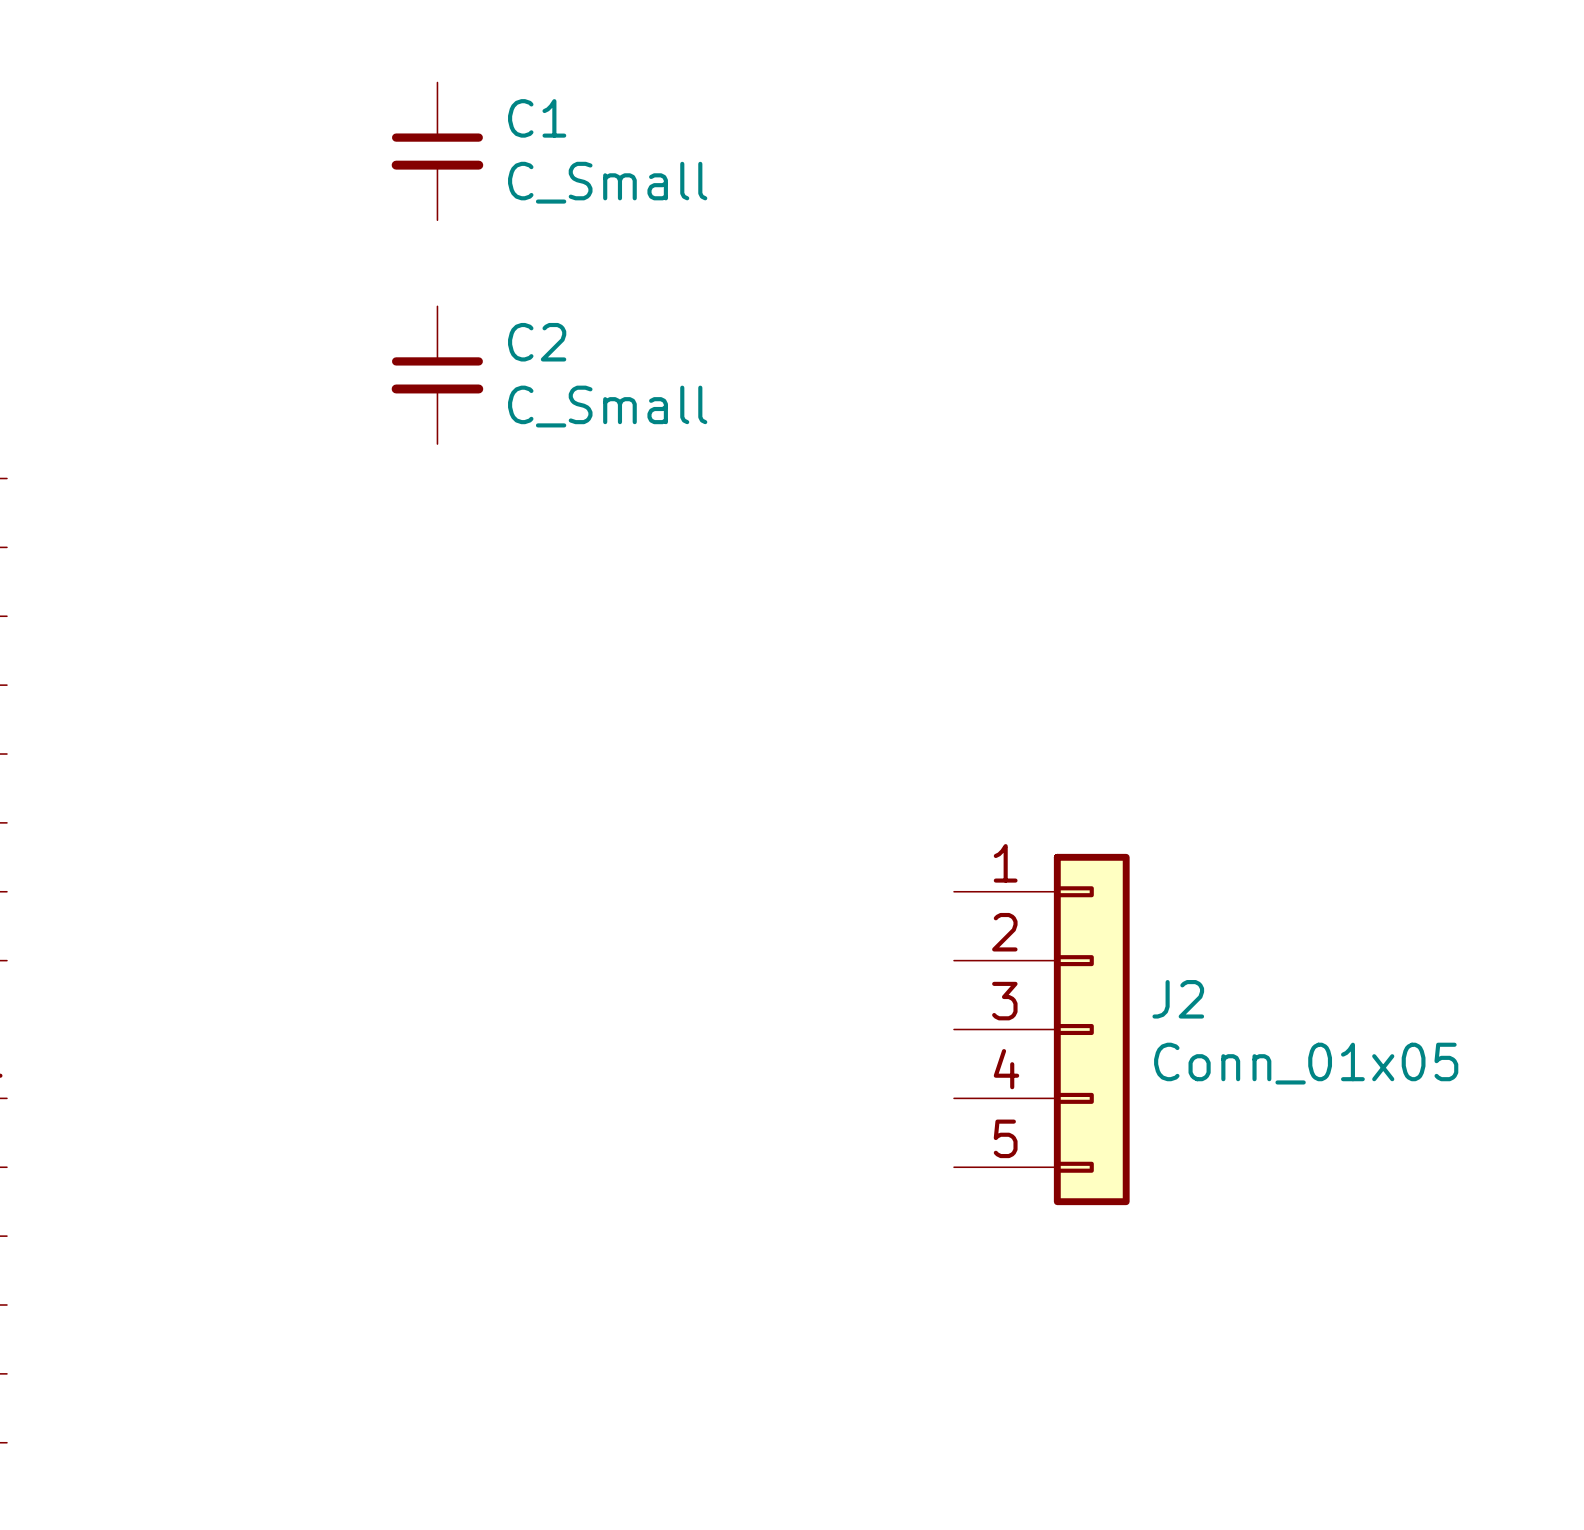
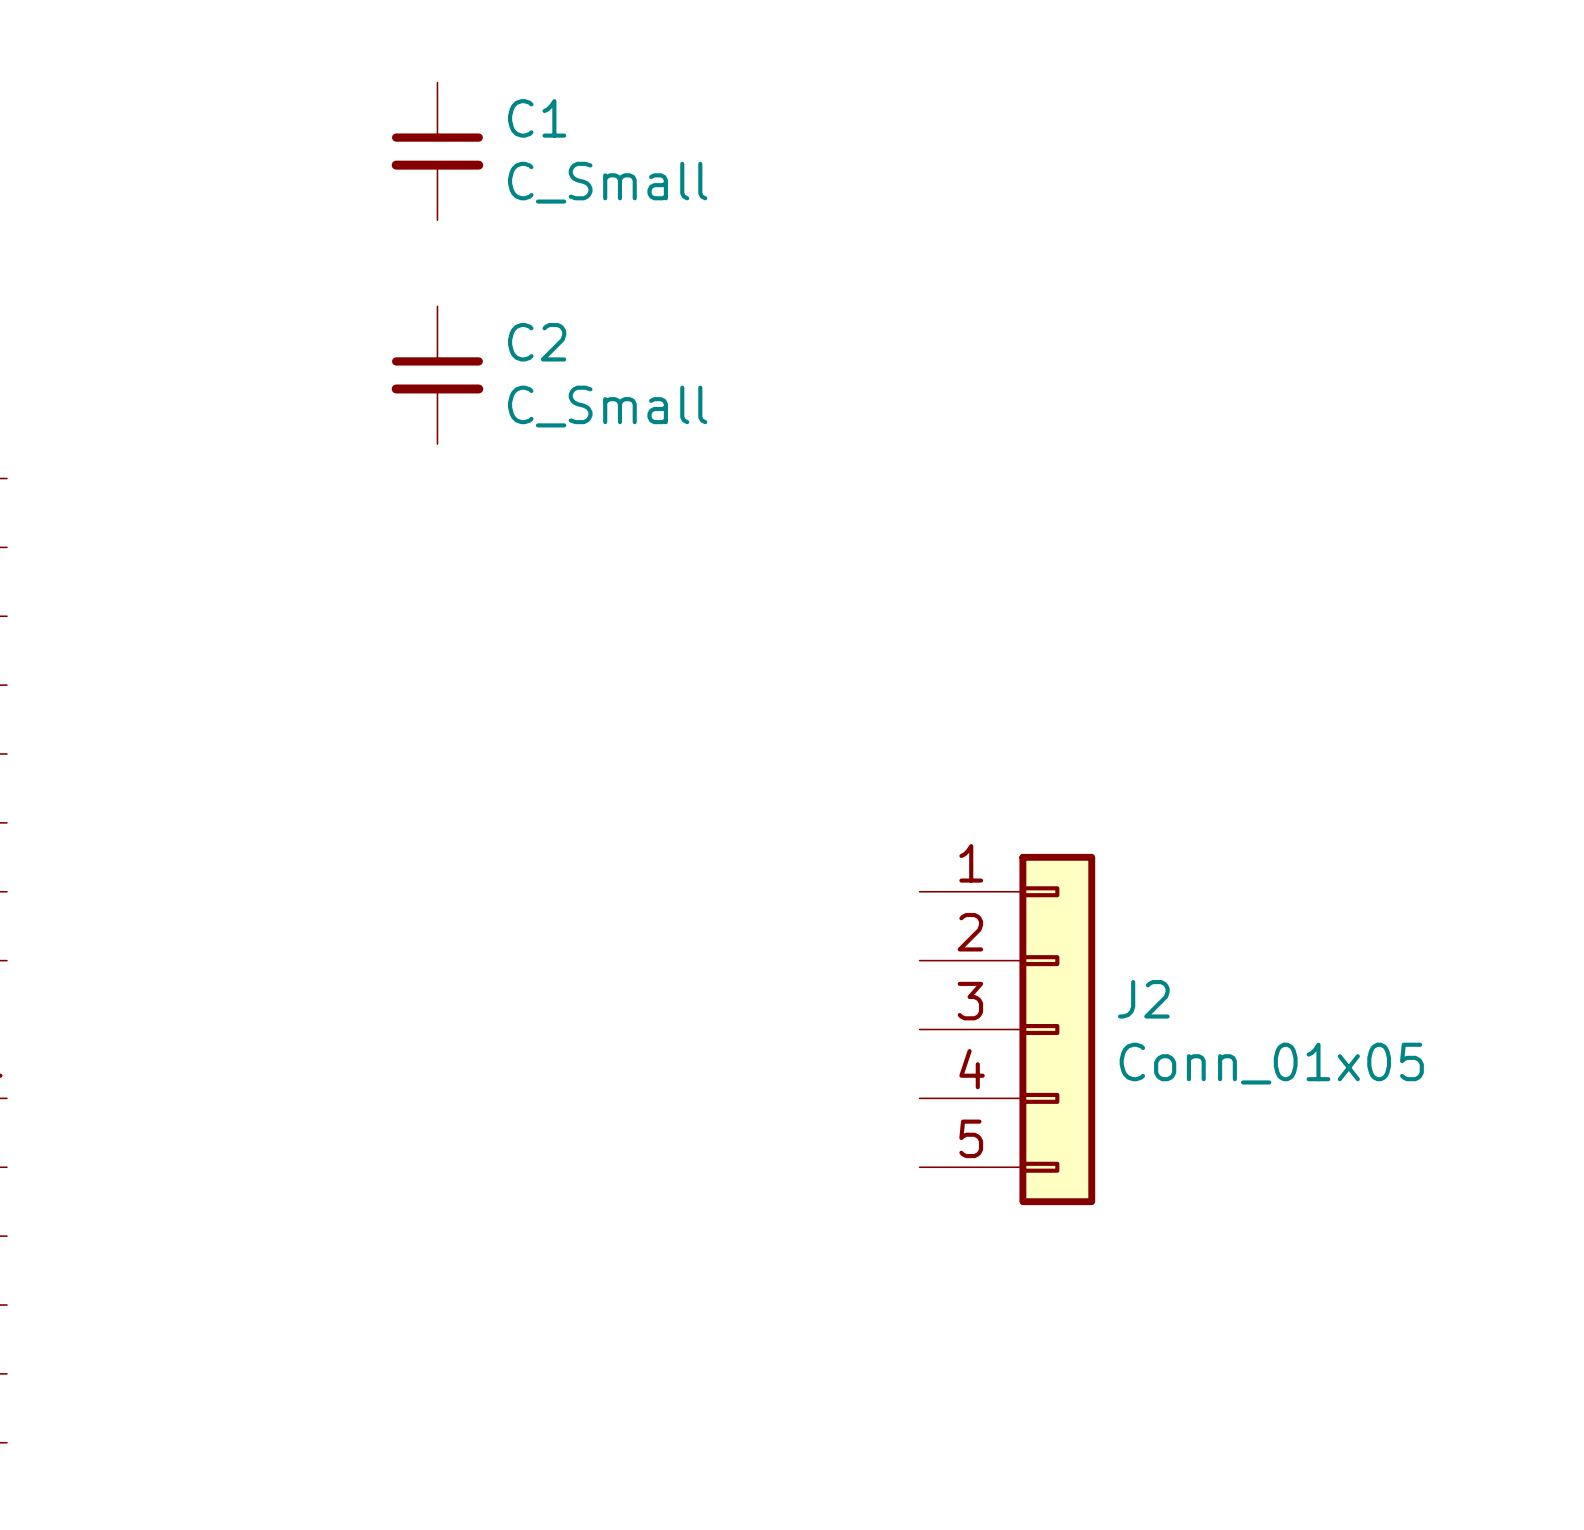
J2 position: (1041, 1029) -> (1007, 1029)

